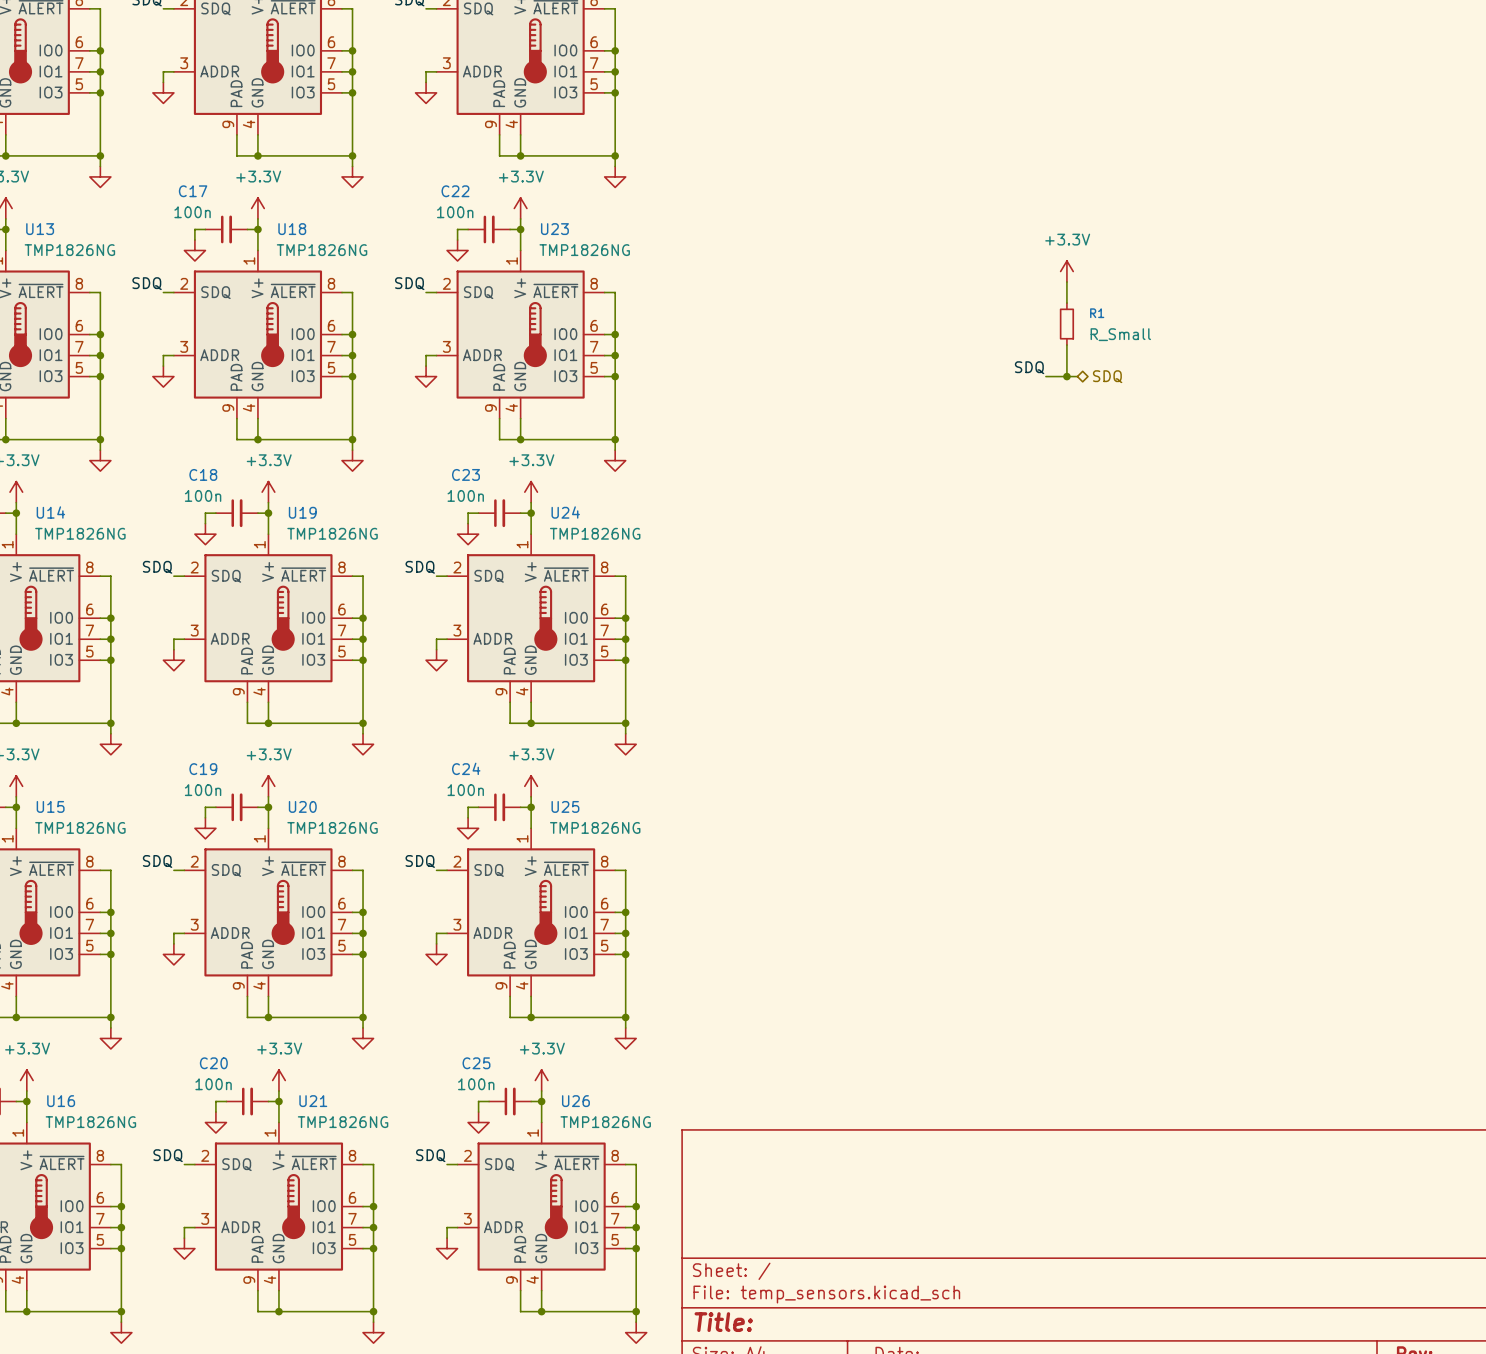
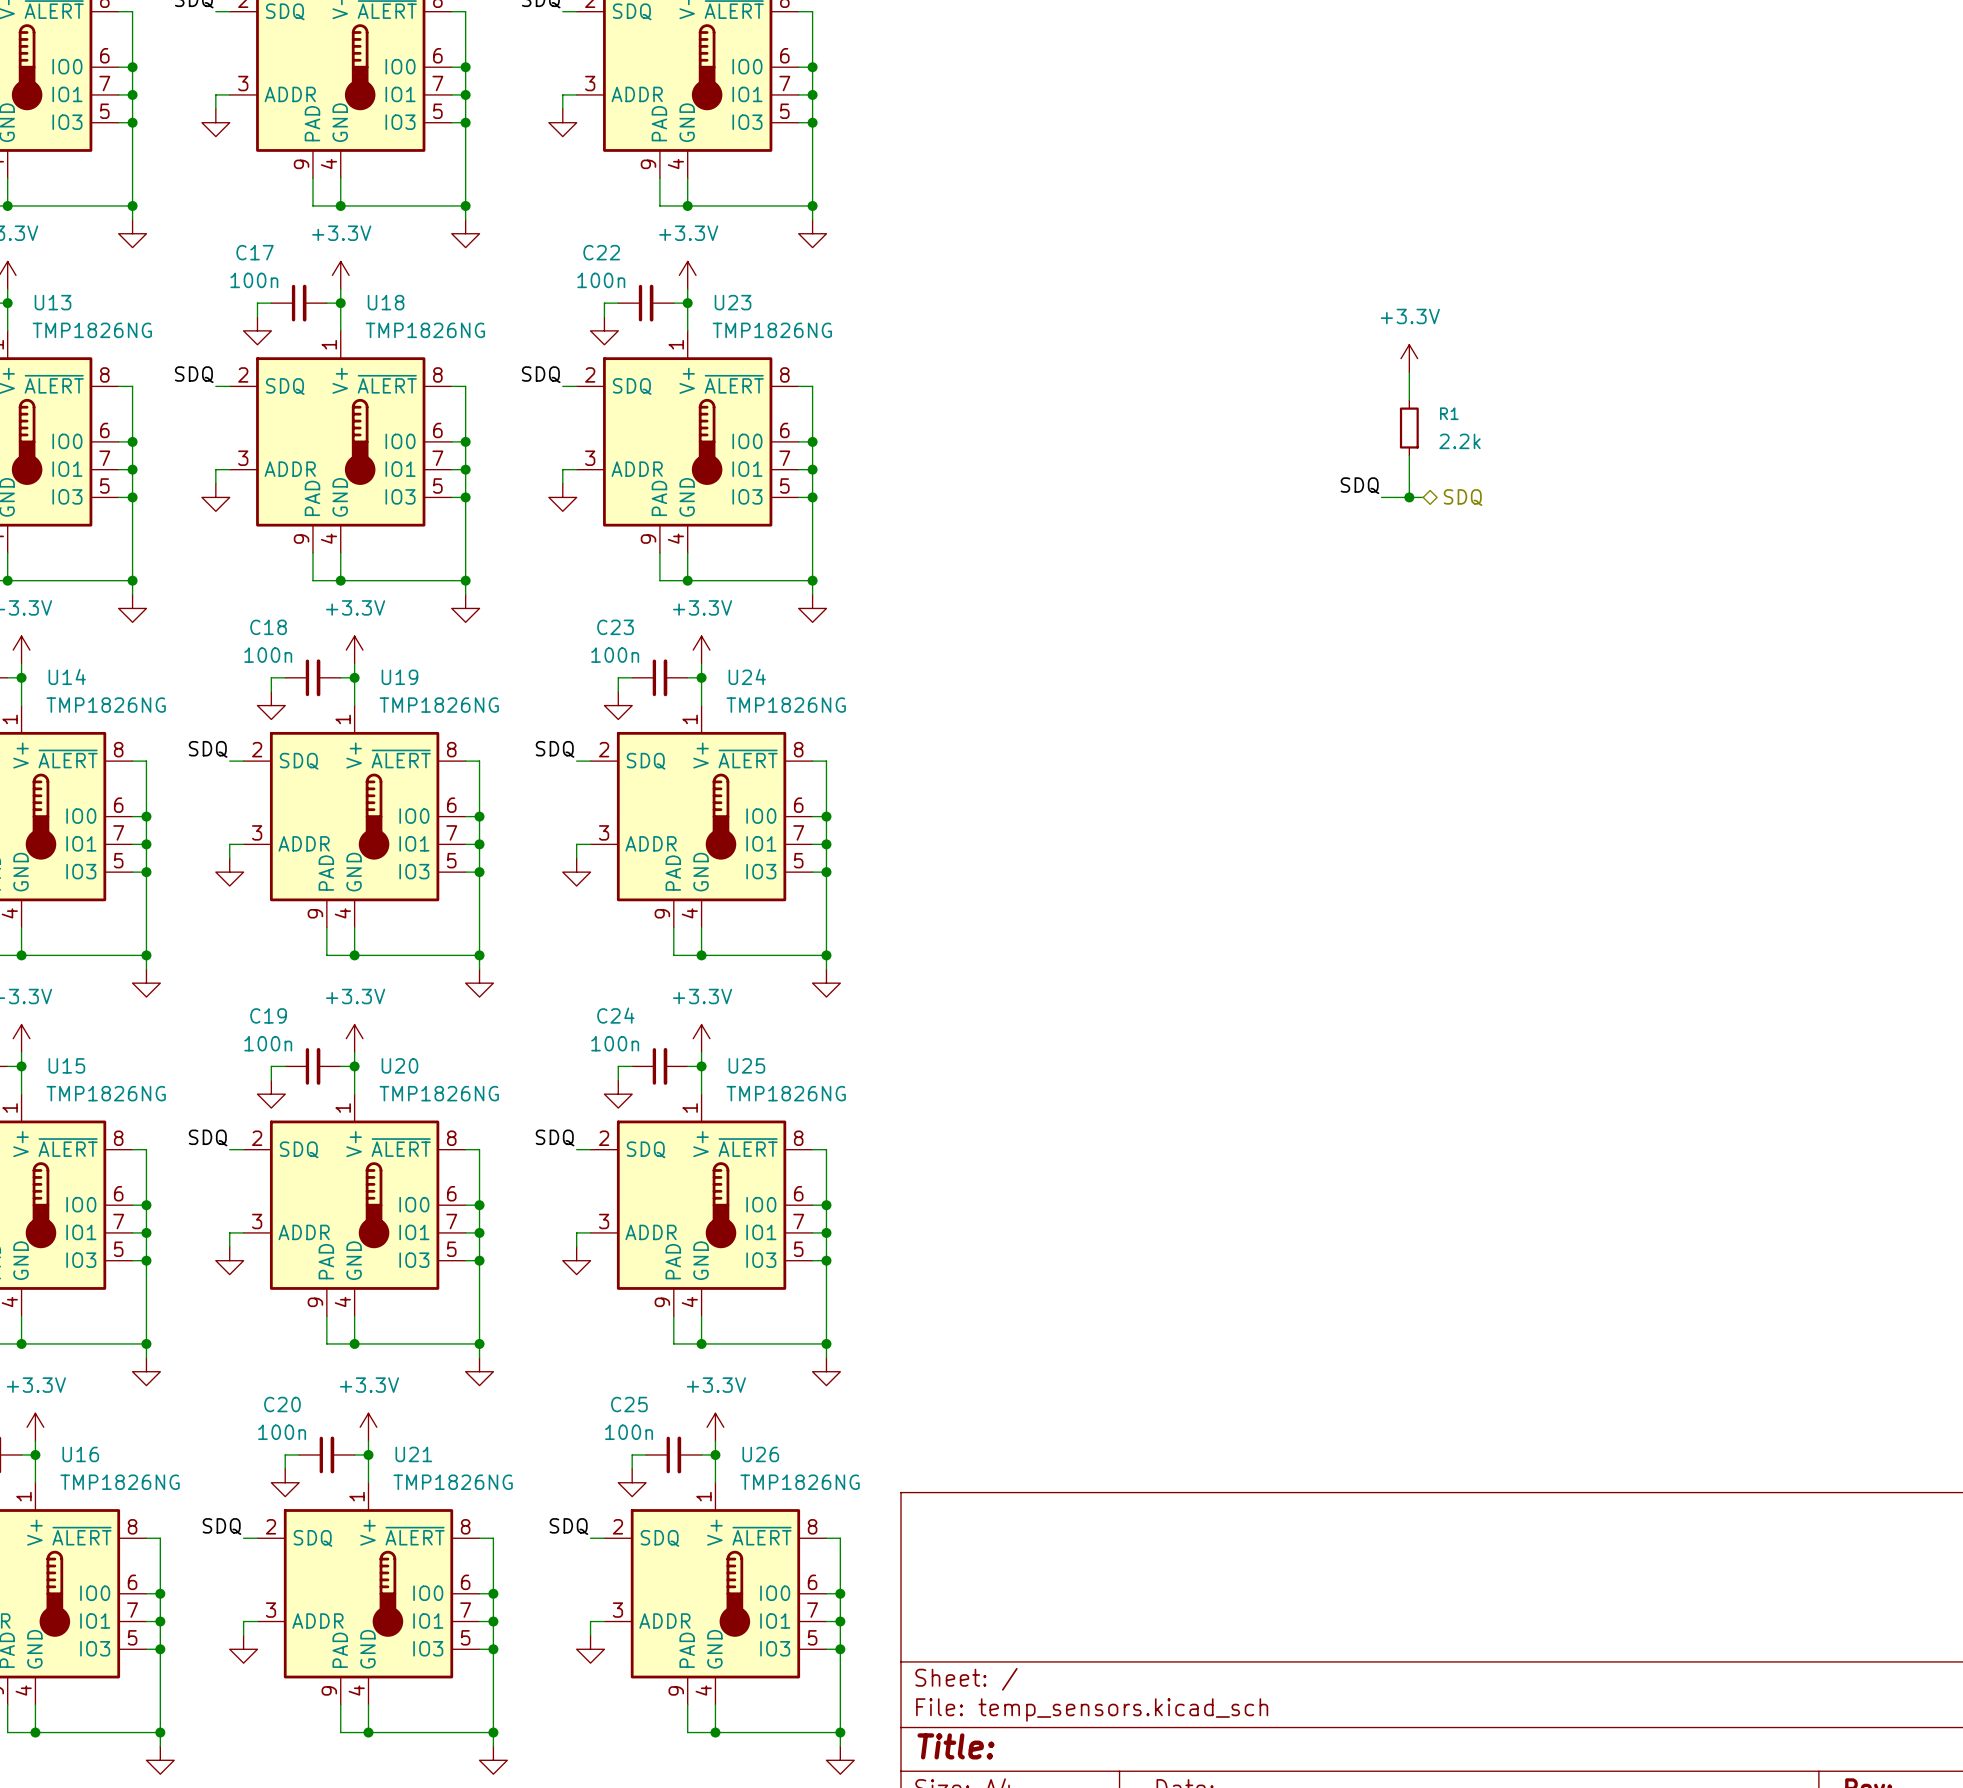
R1 value: R_Small (1120, 334) -> 2.2k (1460, 441)

